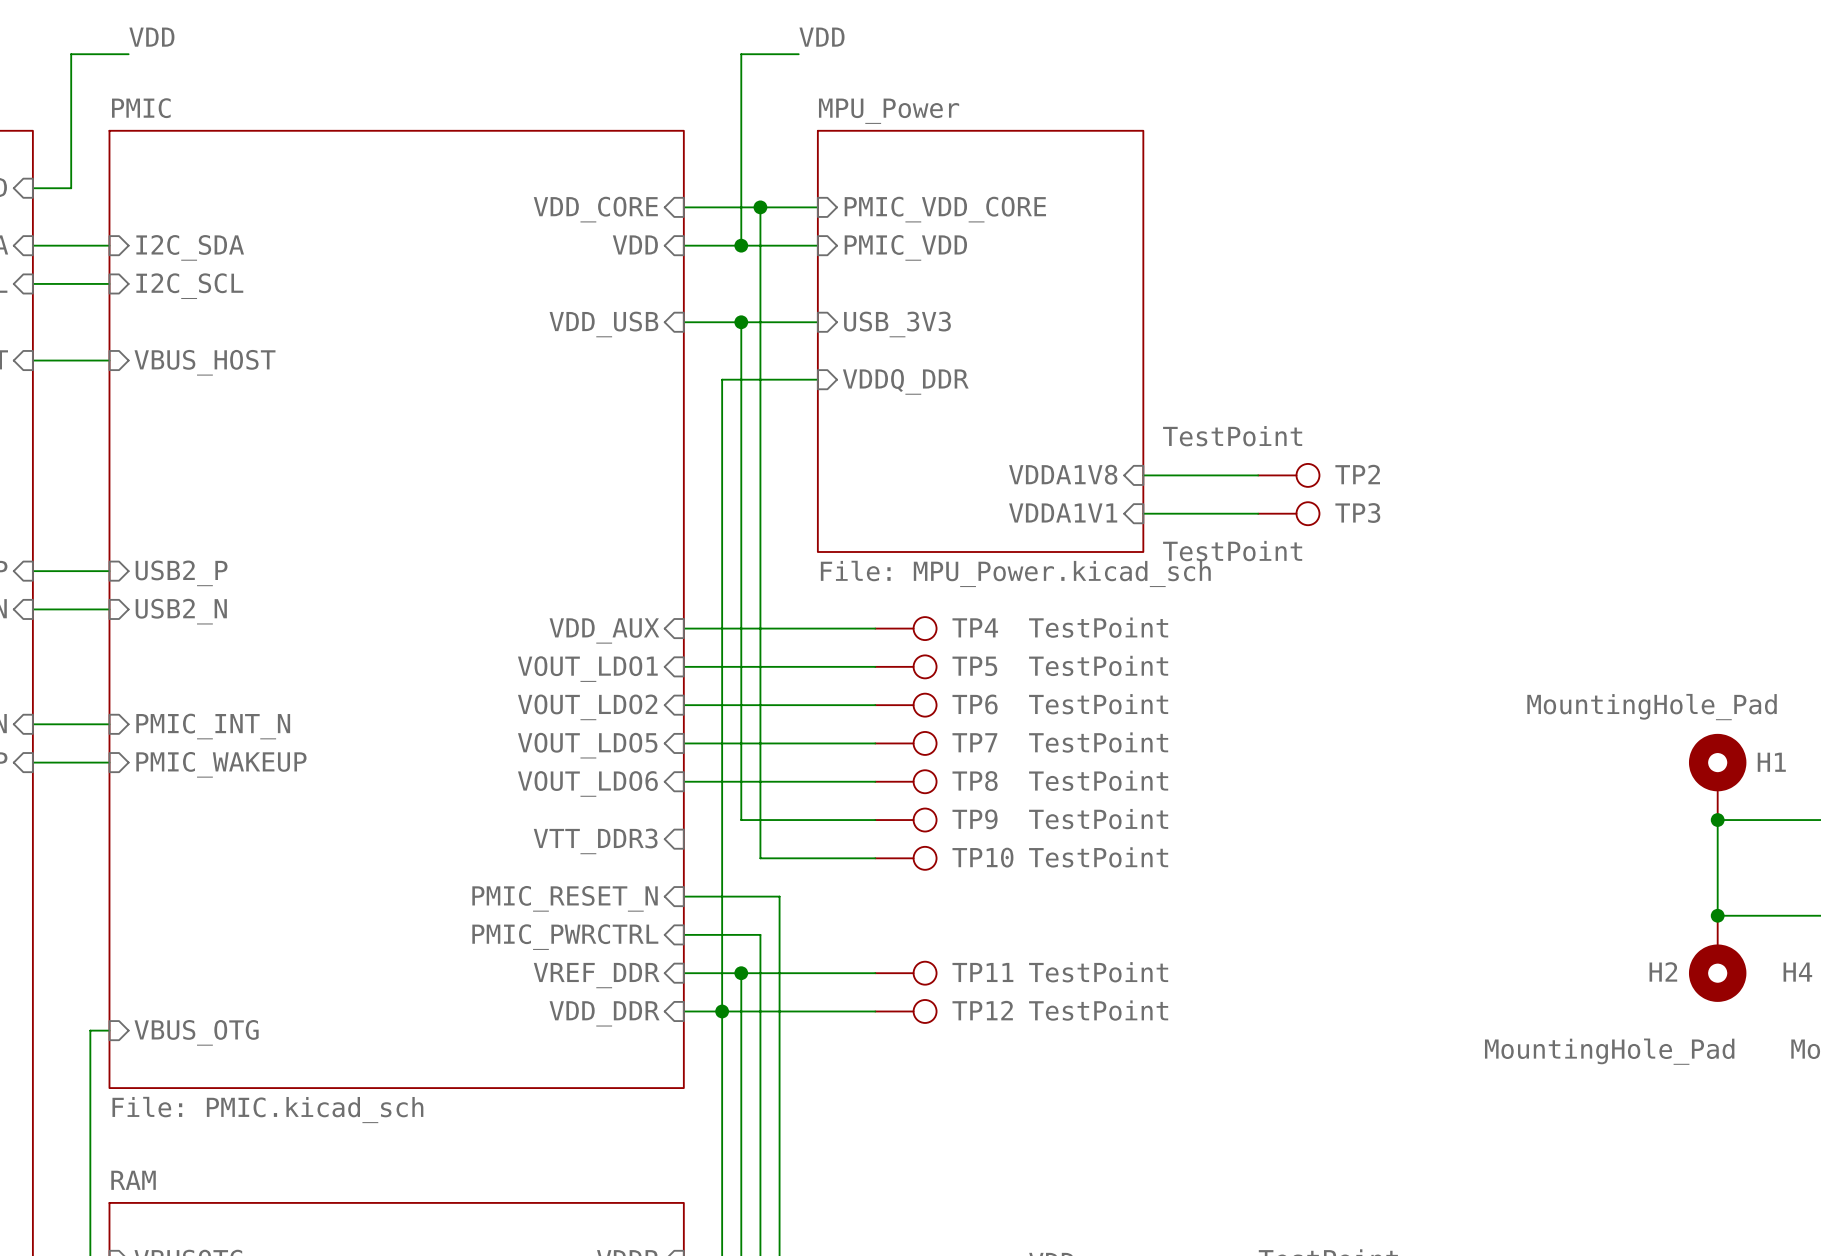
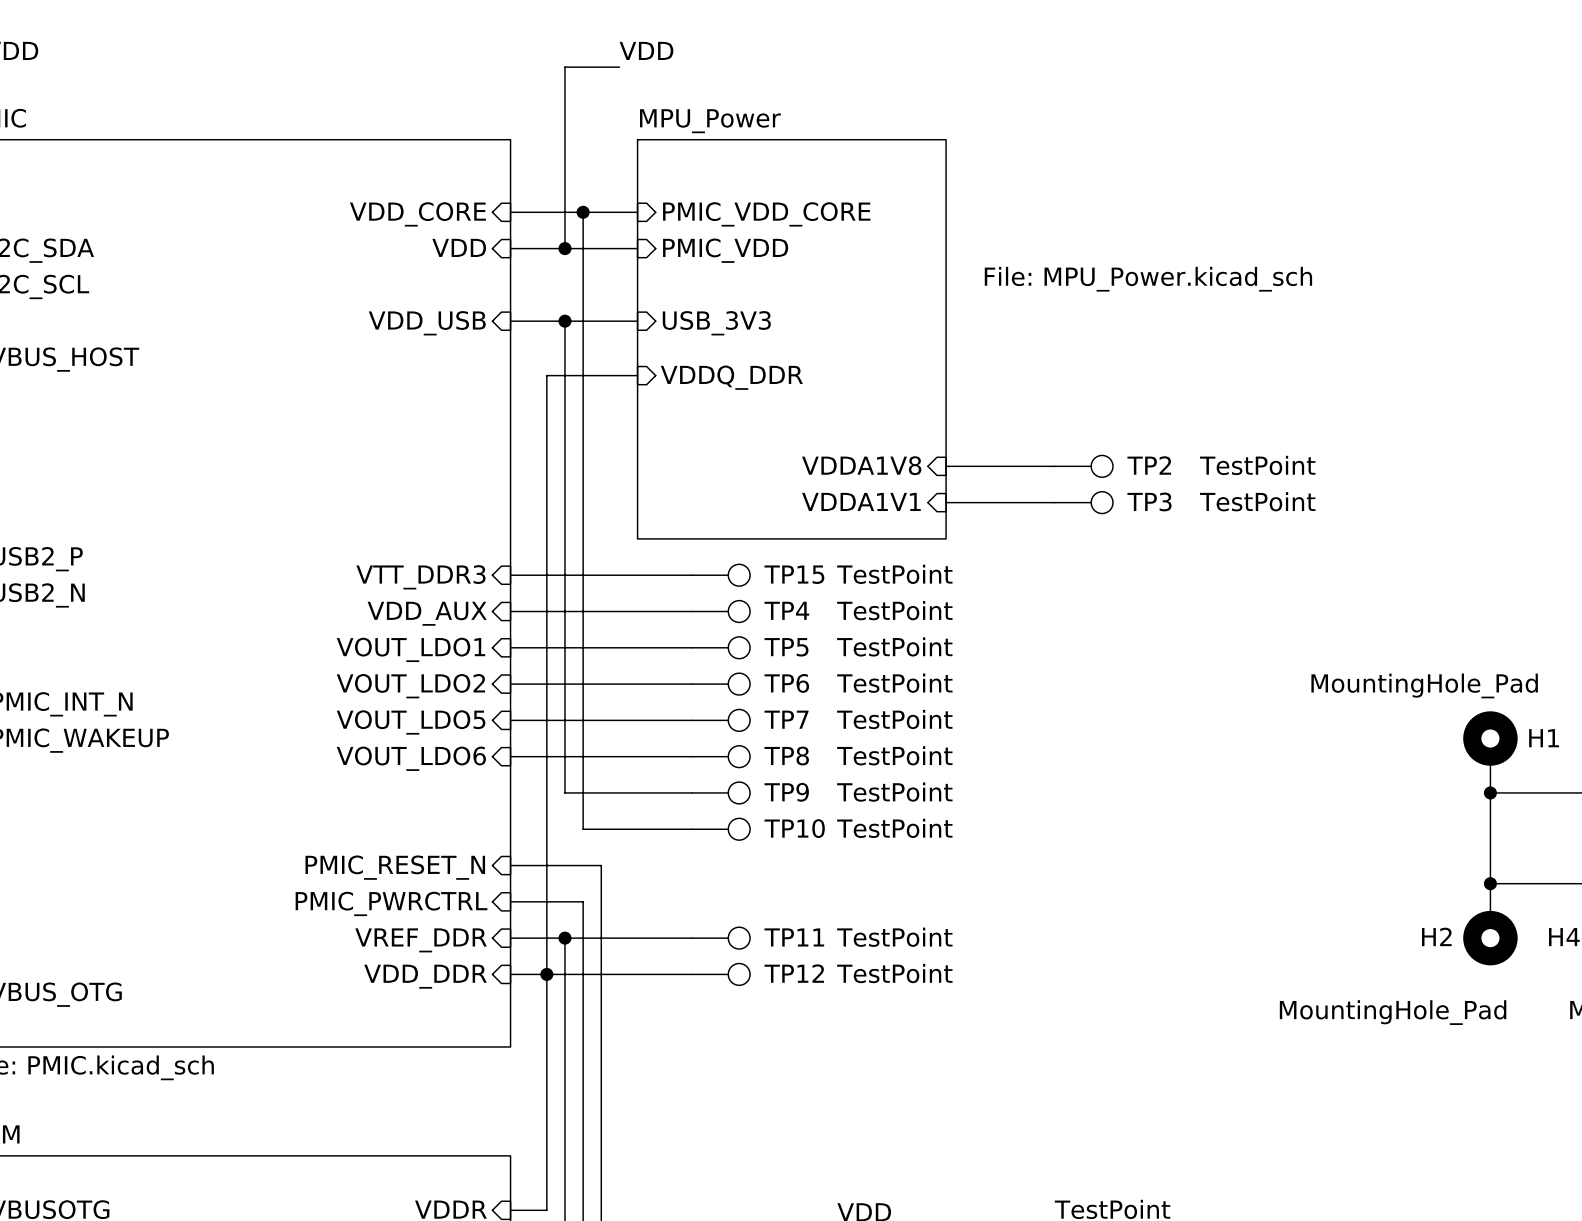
TP2 value position: TestPoint (1232, 436) -> TestPoint (1257, 465)
TP3 value position: TestPoint (1232, 551) -> TestPoint (1257, 501)
sheet MPU_Power value position: File: MPU_Power.kicad_sch (1015, 573) -> File: MPU_Power.kicad_sch (1148, 279)
wire: none -> (510, 575) (692, 575)
TP15: none -> TestPoint (721, 575)
sheet pin position: VTT_DDR3 (595, 841) -> VTT_DDR3 (420, 577)

